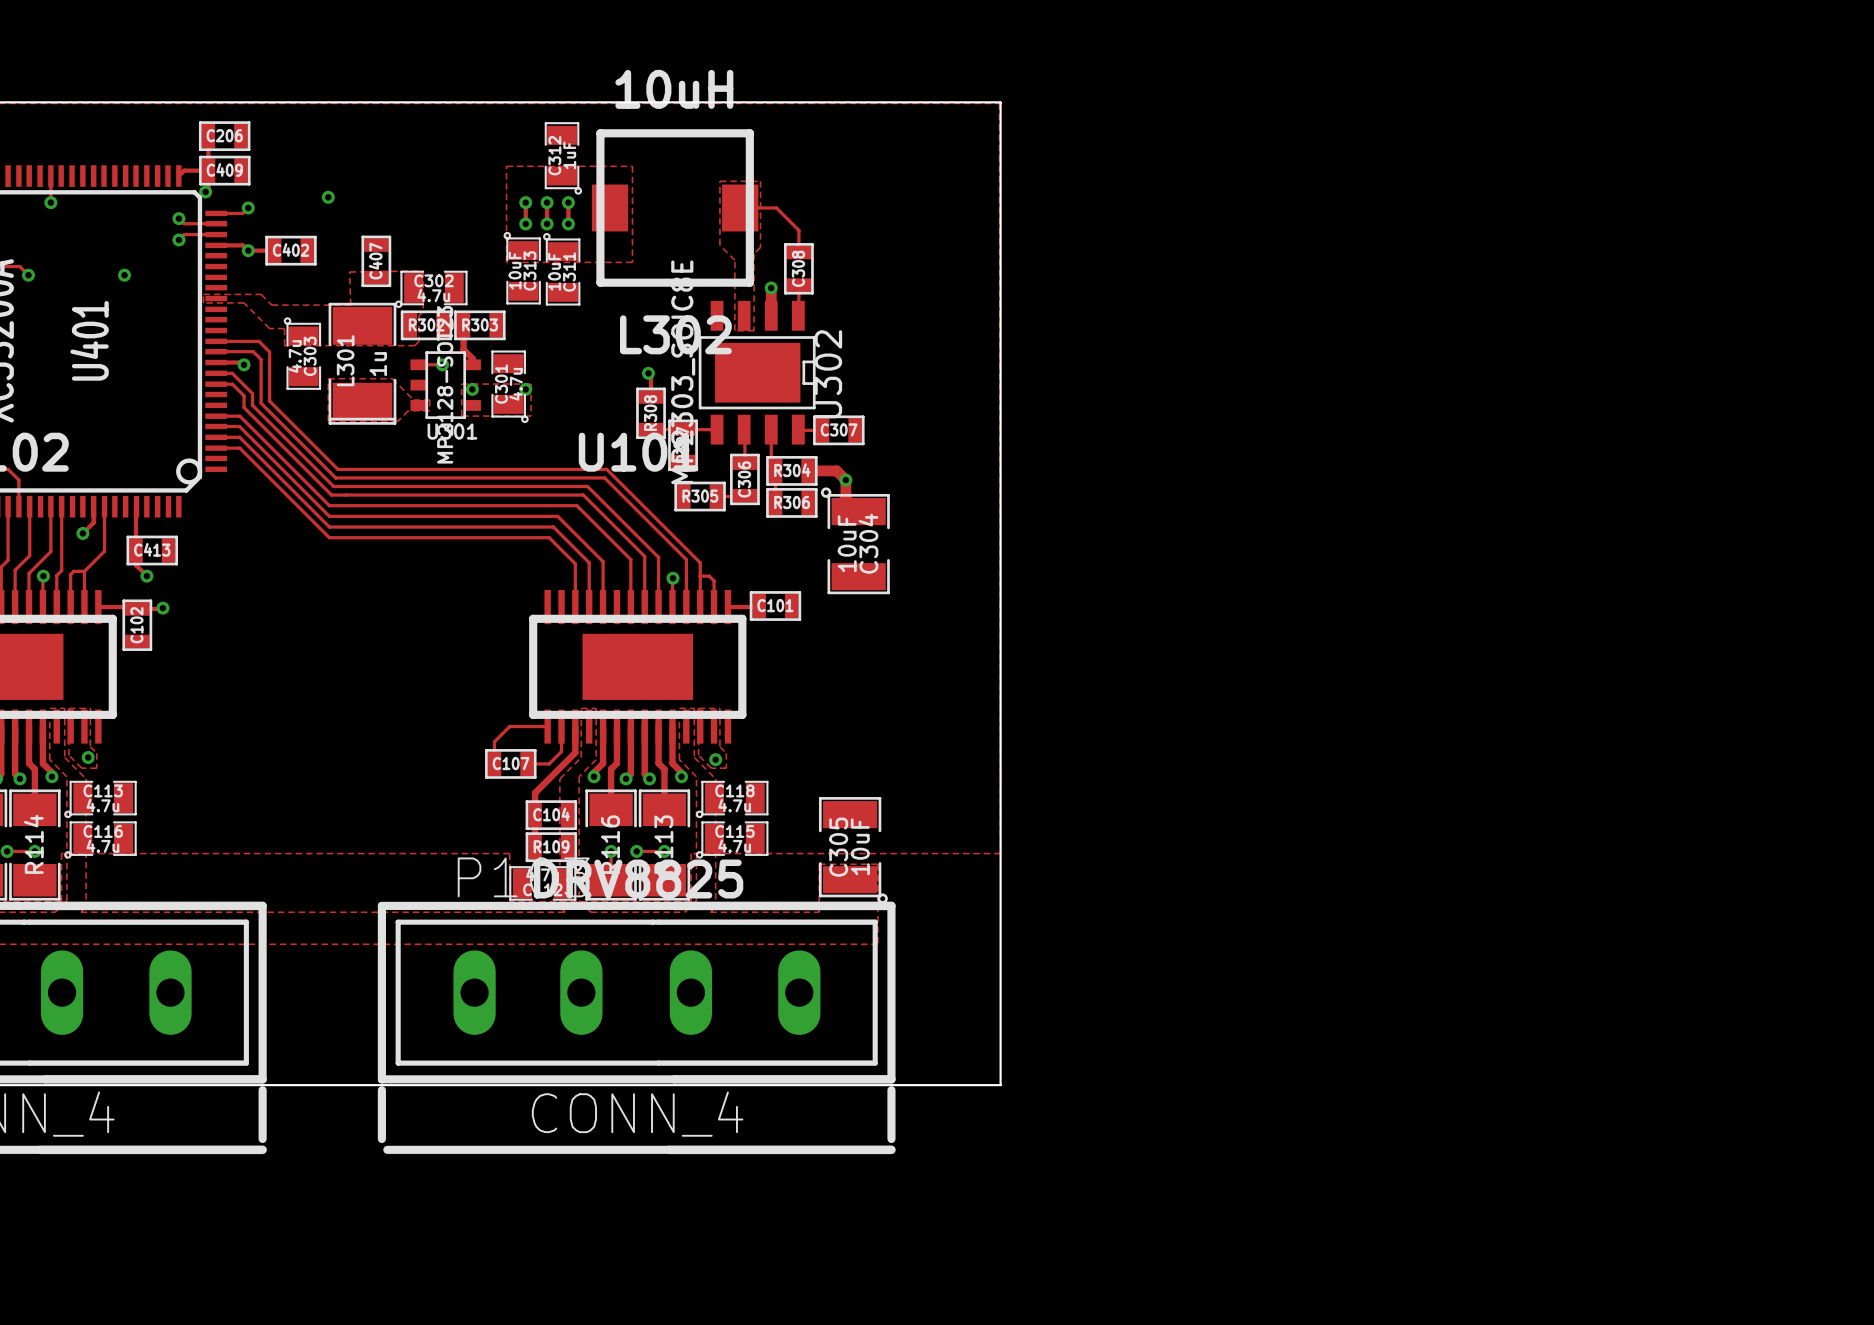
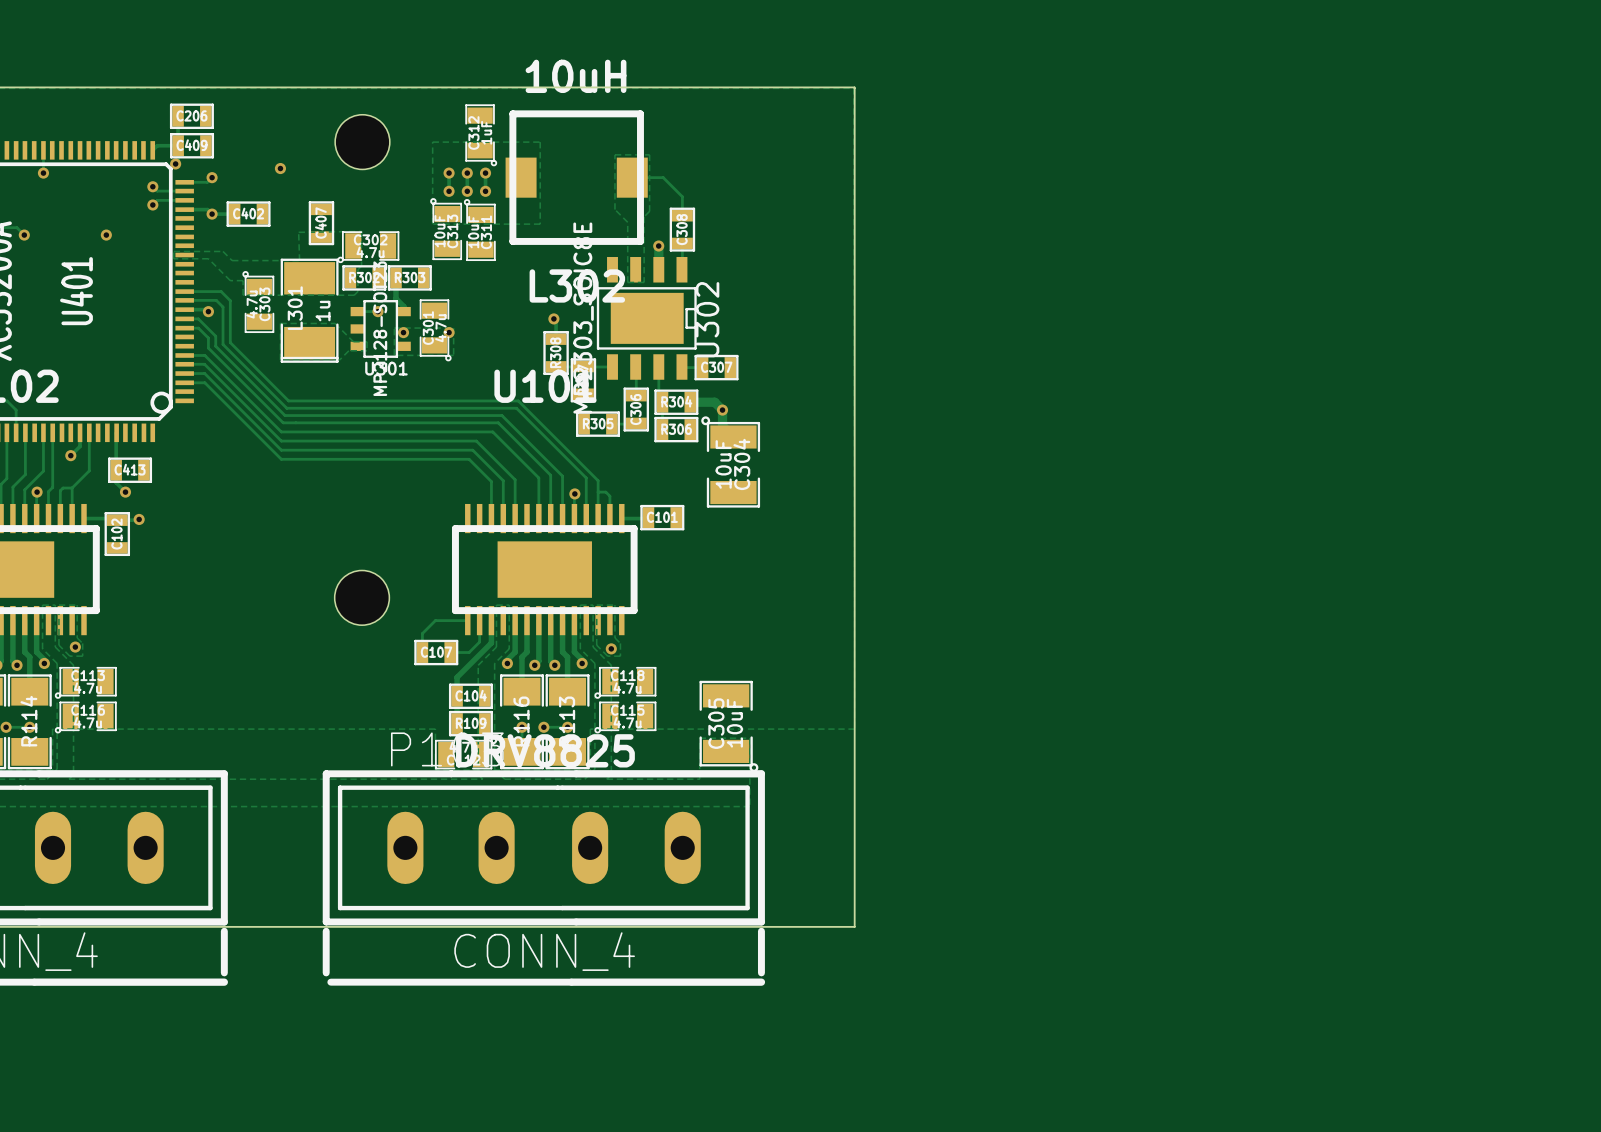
part: none -> (362, 142)
part: none -> (362, 597)

